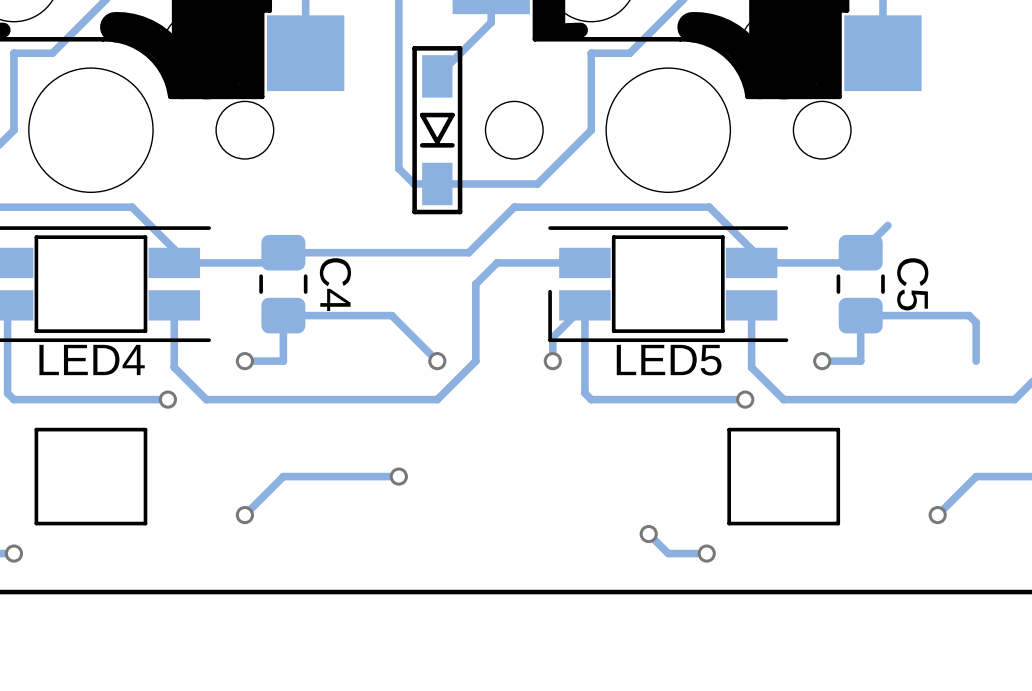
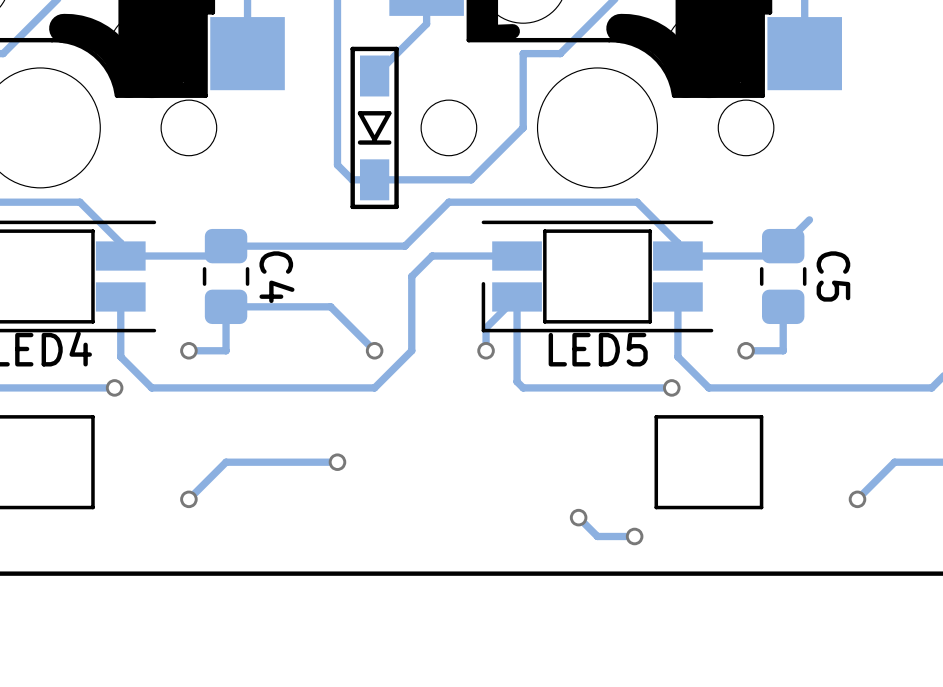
track: (860, 315) (969, 315) (976, 322) (976, 361) -> none

